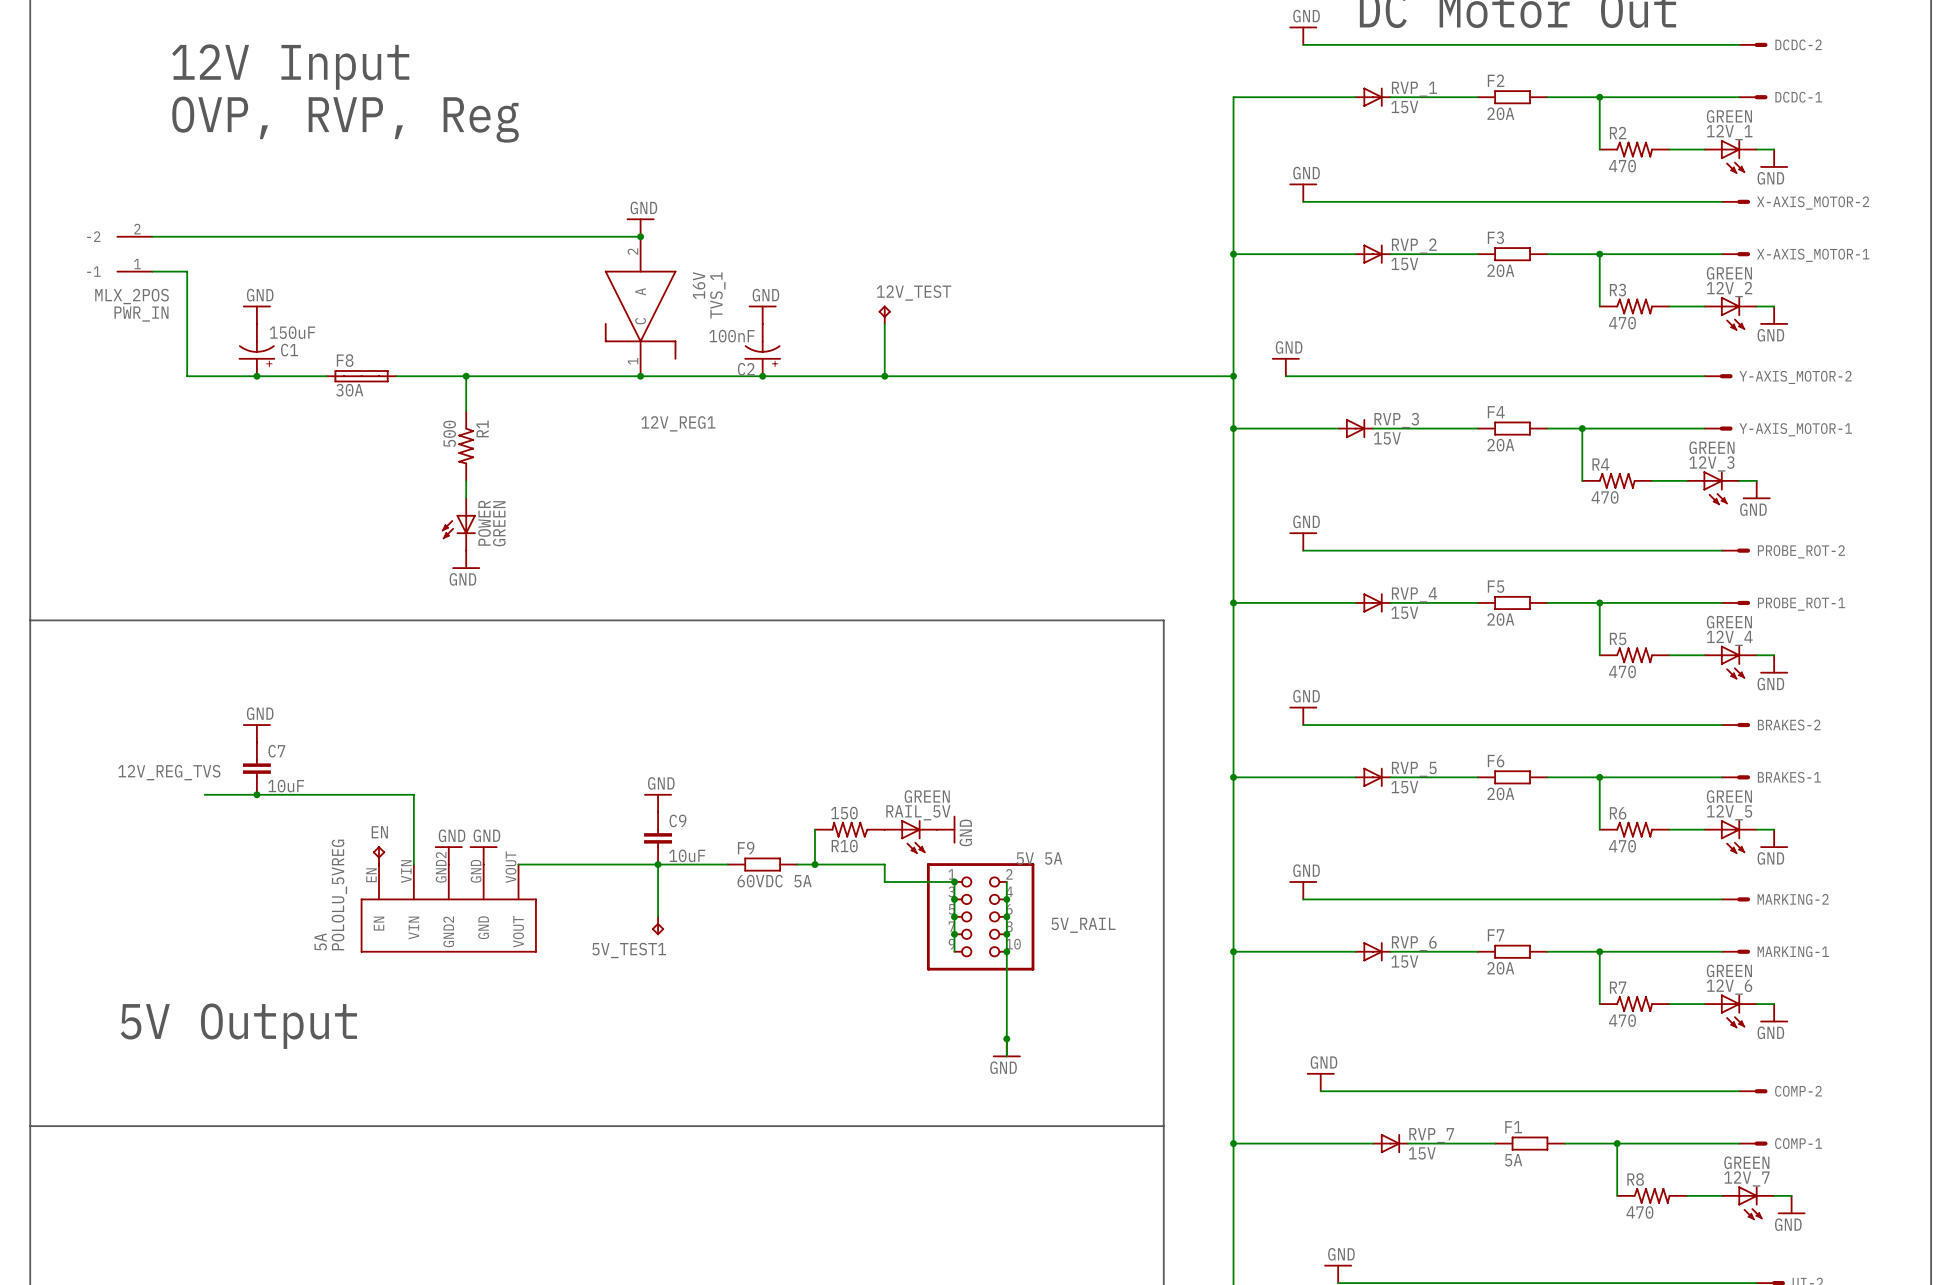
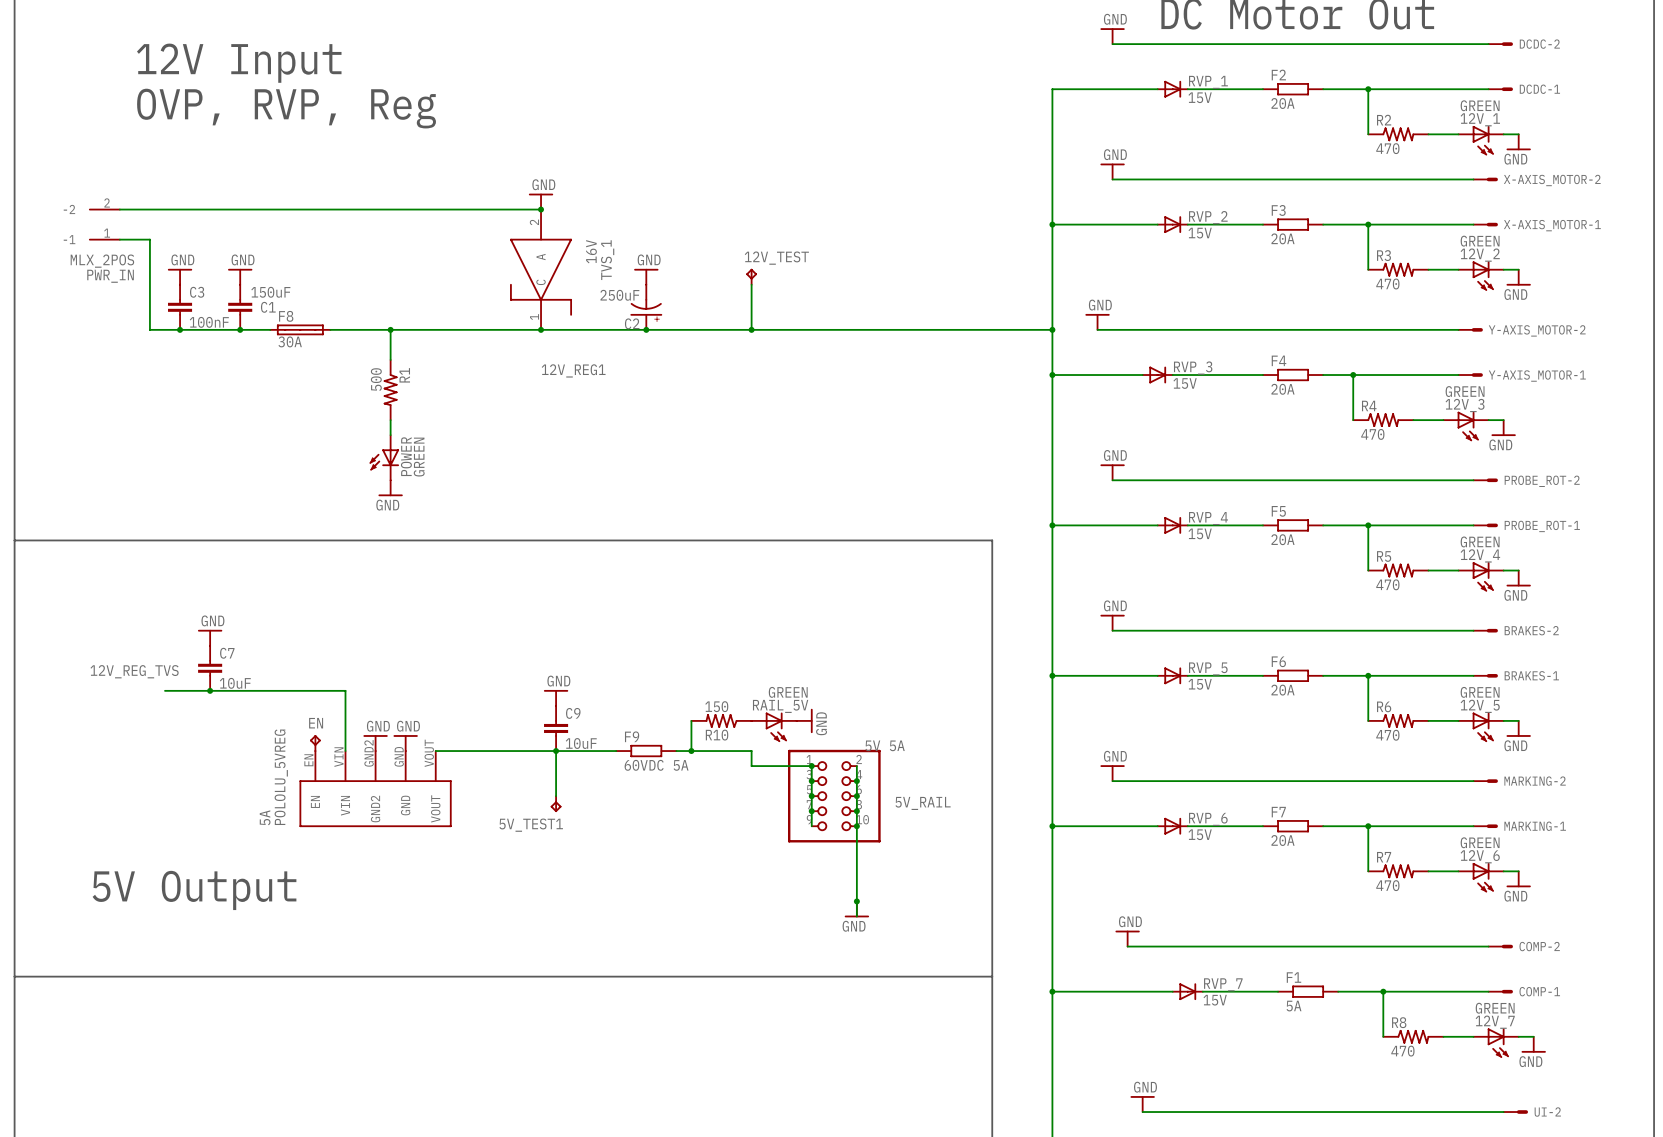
power symbol: none -> GND (180, 276)
power symbol: GND (256, 314) -> none
power symbol: none -> GND (240, 276)
C1 symbol: [238, 323, 276, 377] -> [228, 284, 253, 330]
C2 value: 100nF (731, 336) -> 250uF (619, 295)
C3: none -> 100nF (180, 307)
junction: none -> (180, 329)
junction: (256, 376) -> none
junction: none -> (240, 329)

